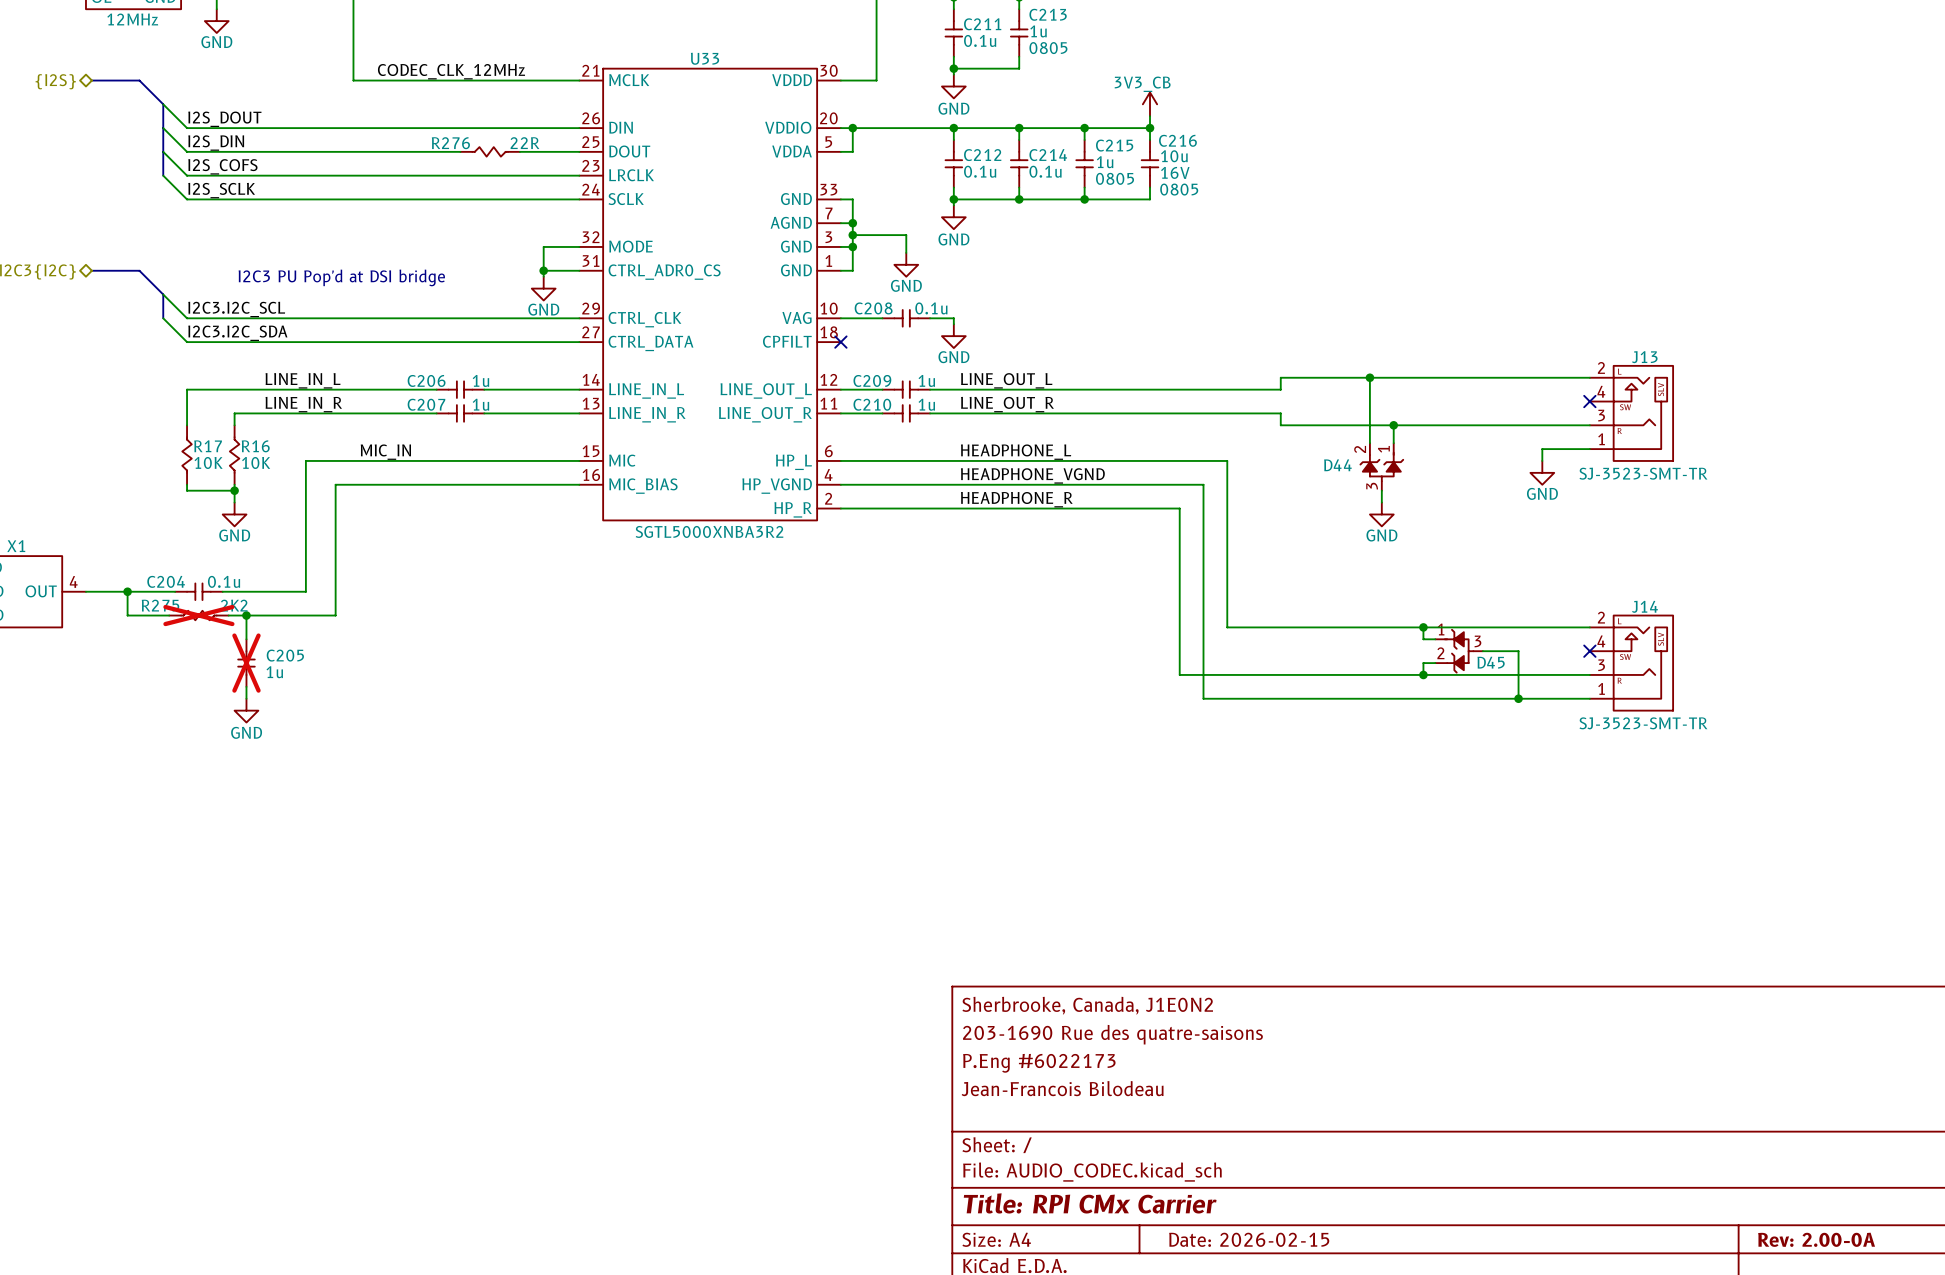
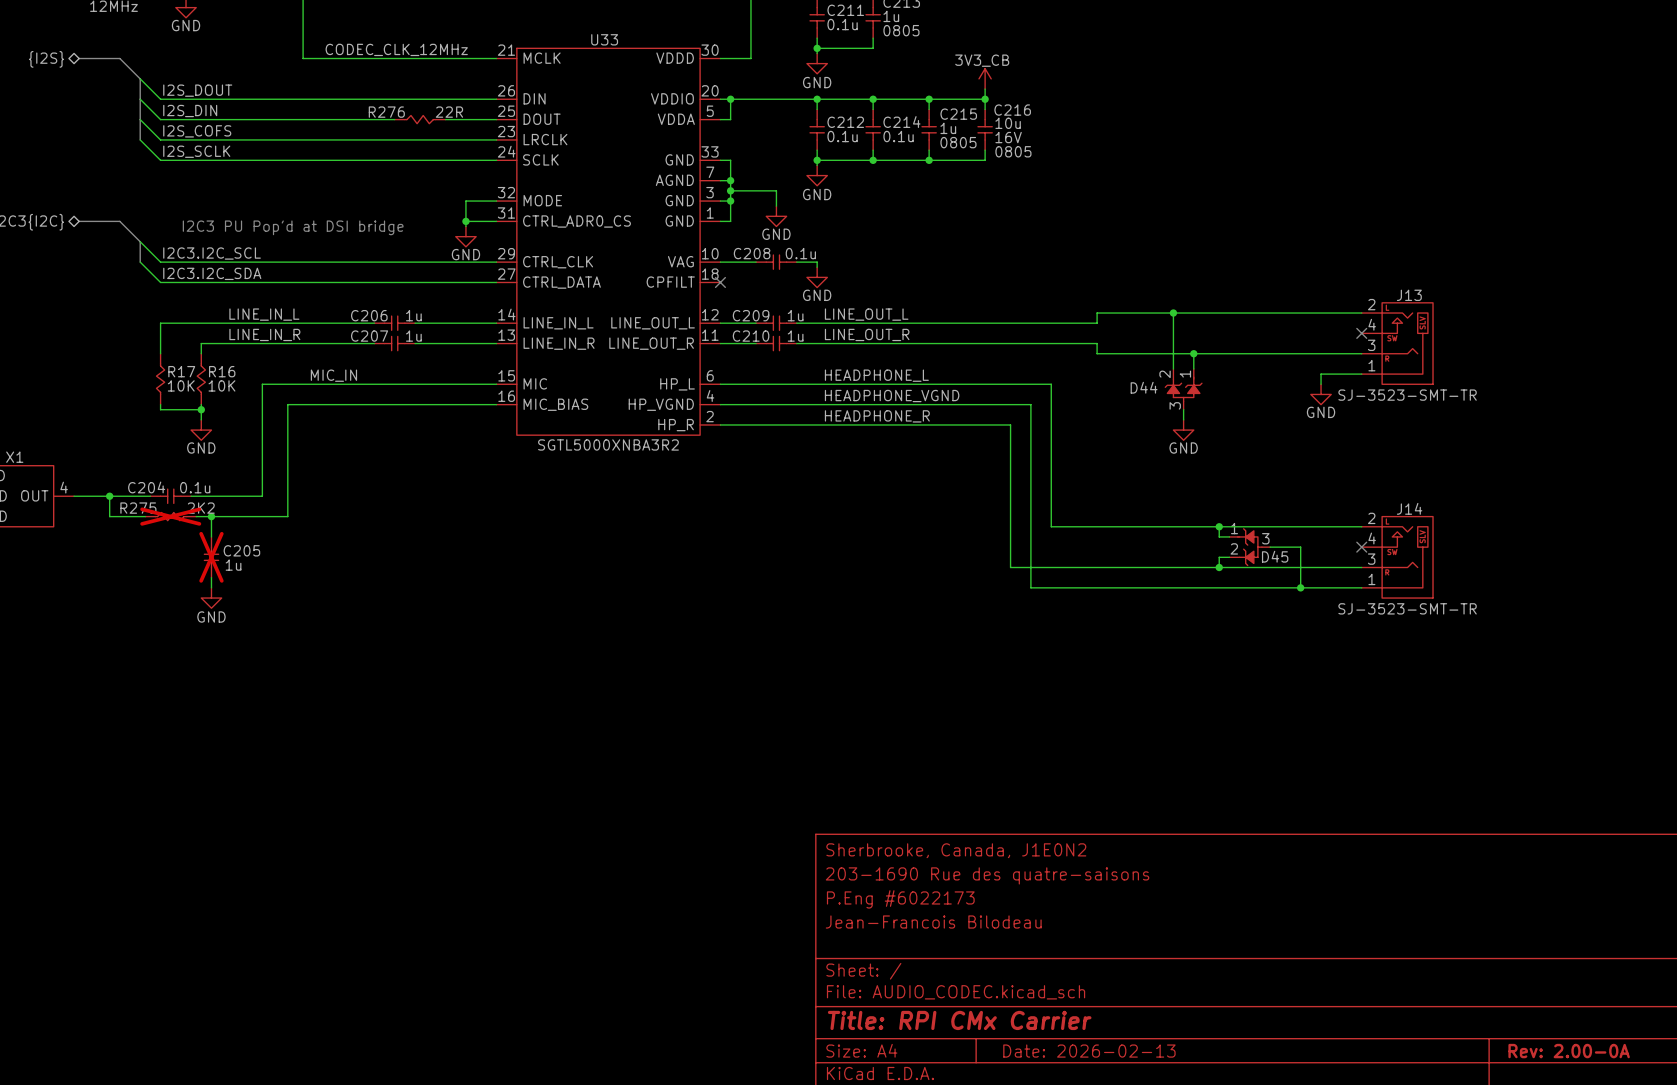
title block: Date: 2026-02-15 (1249, 1239) -> Date: 2026-02-13 (1089, 1051)

